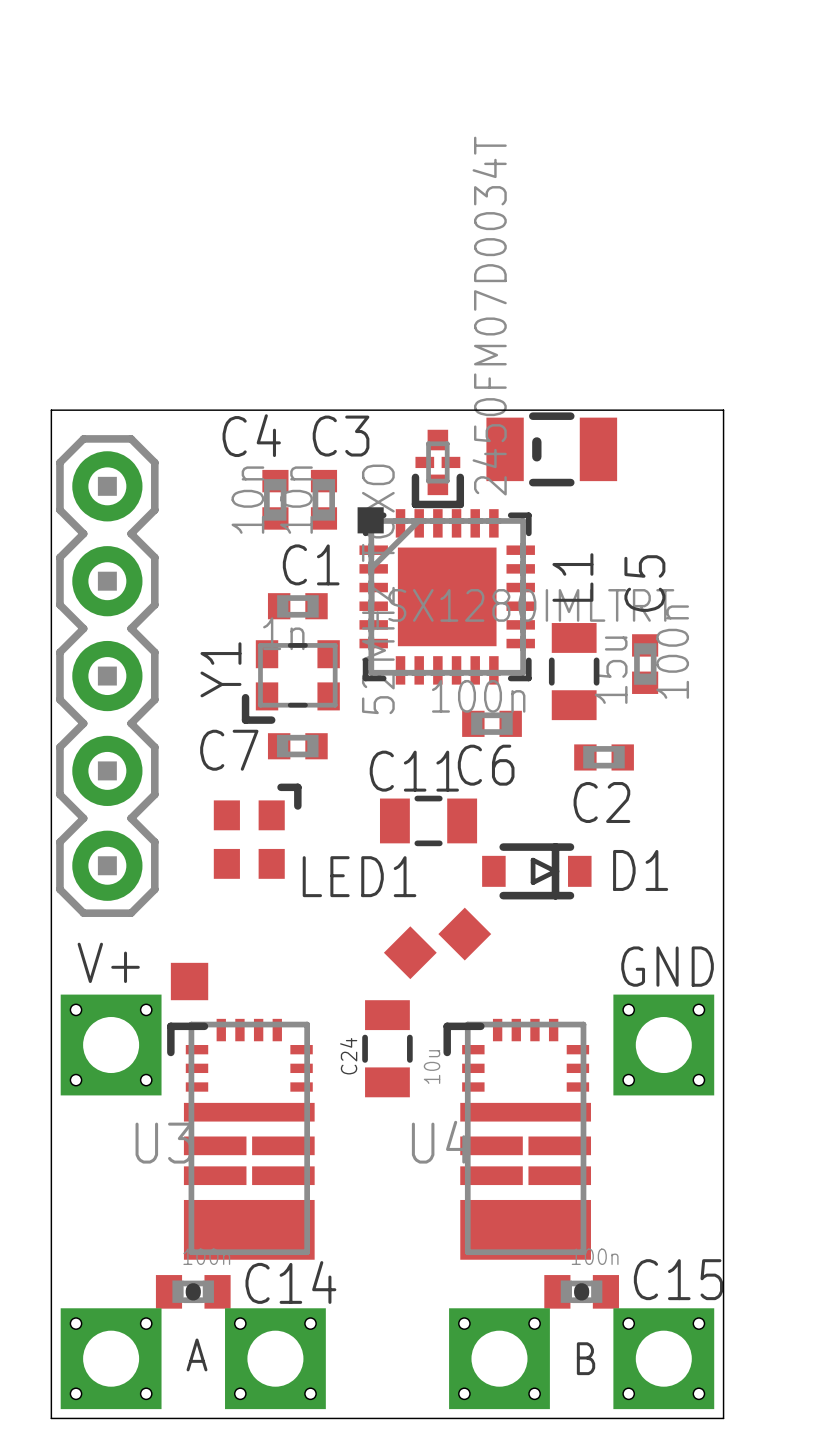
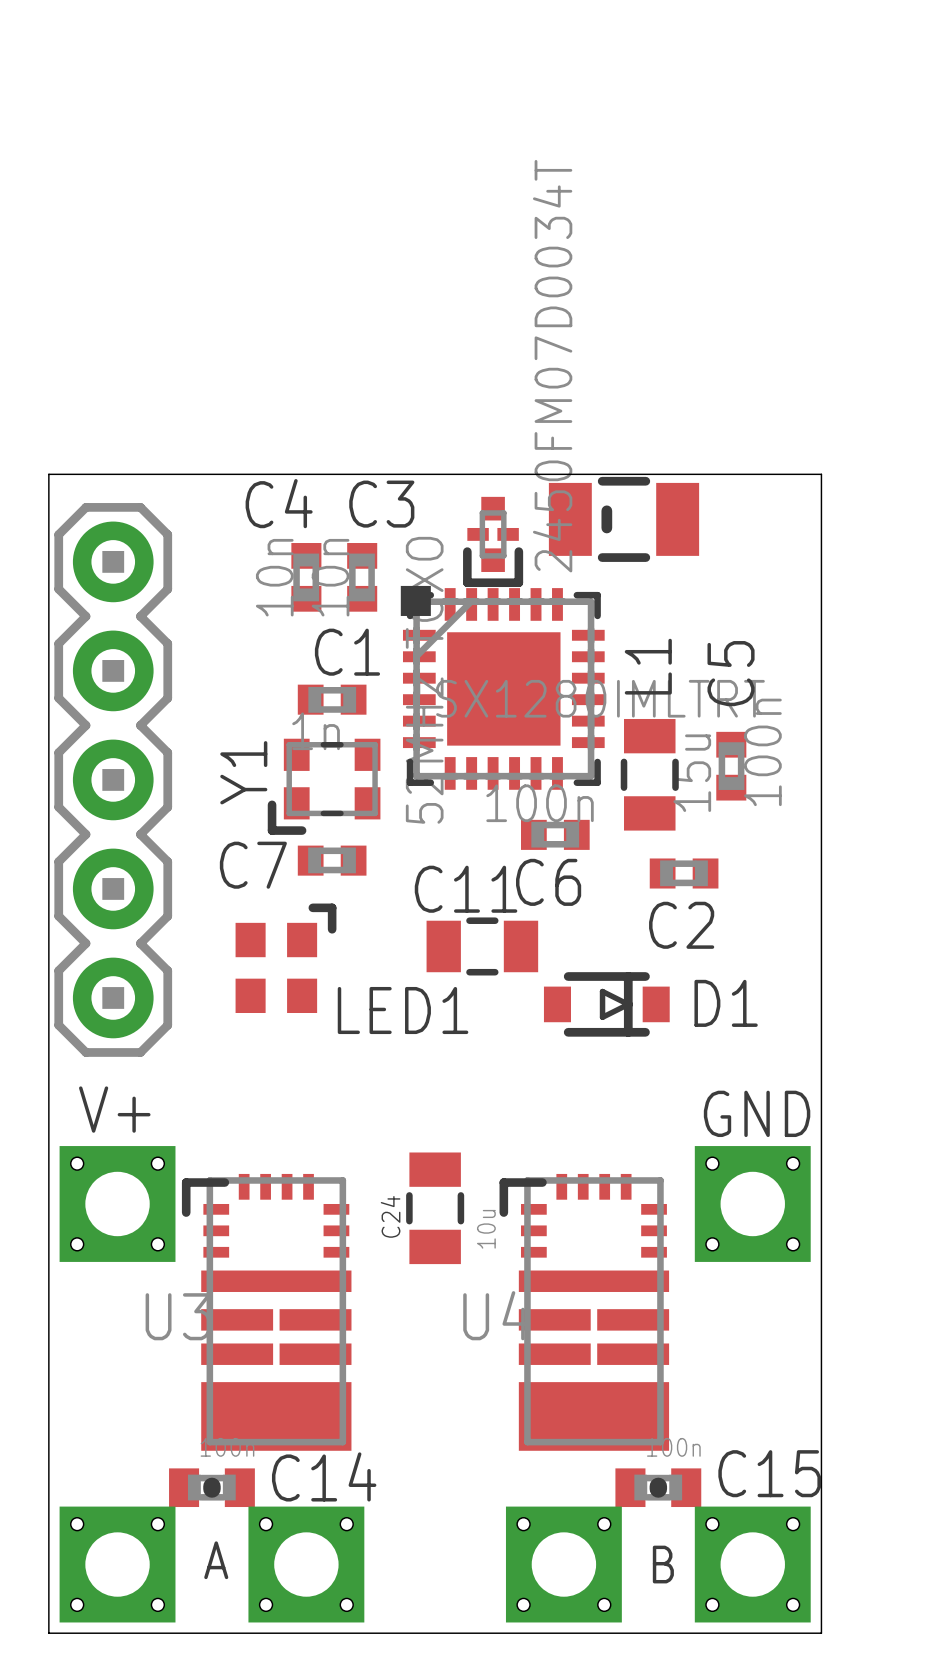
part: (464, 934) -> none
part: (410, 952) -> none
part: (189, 981) -> none

